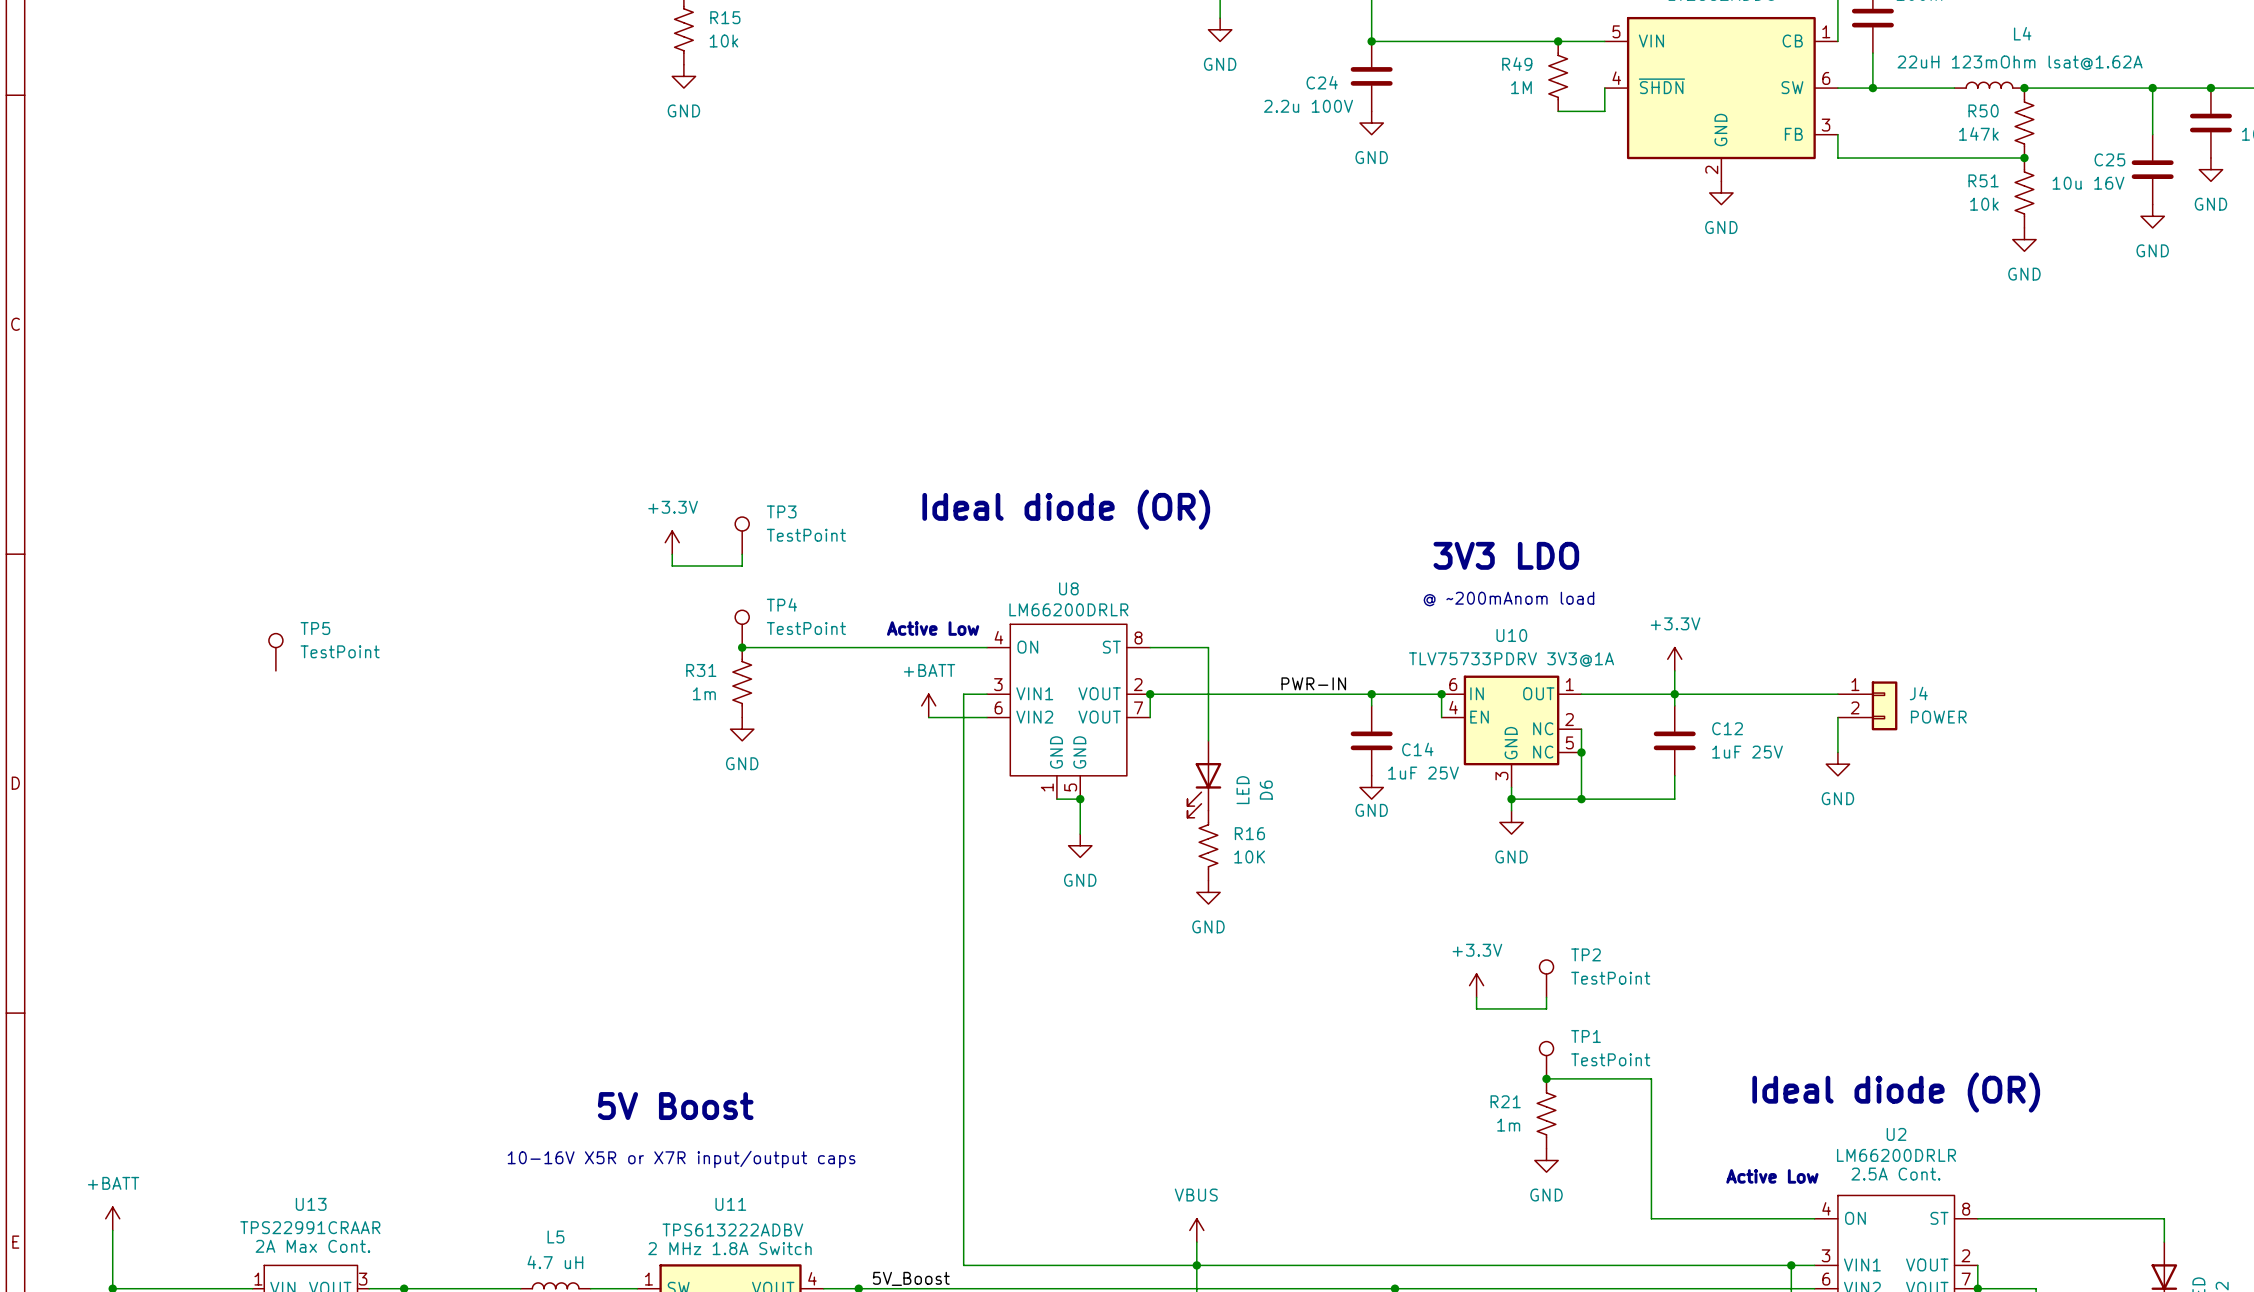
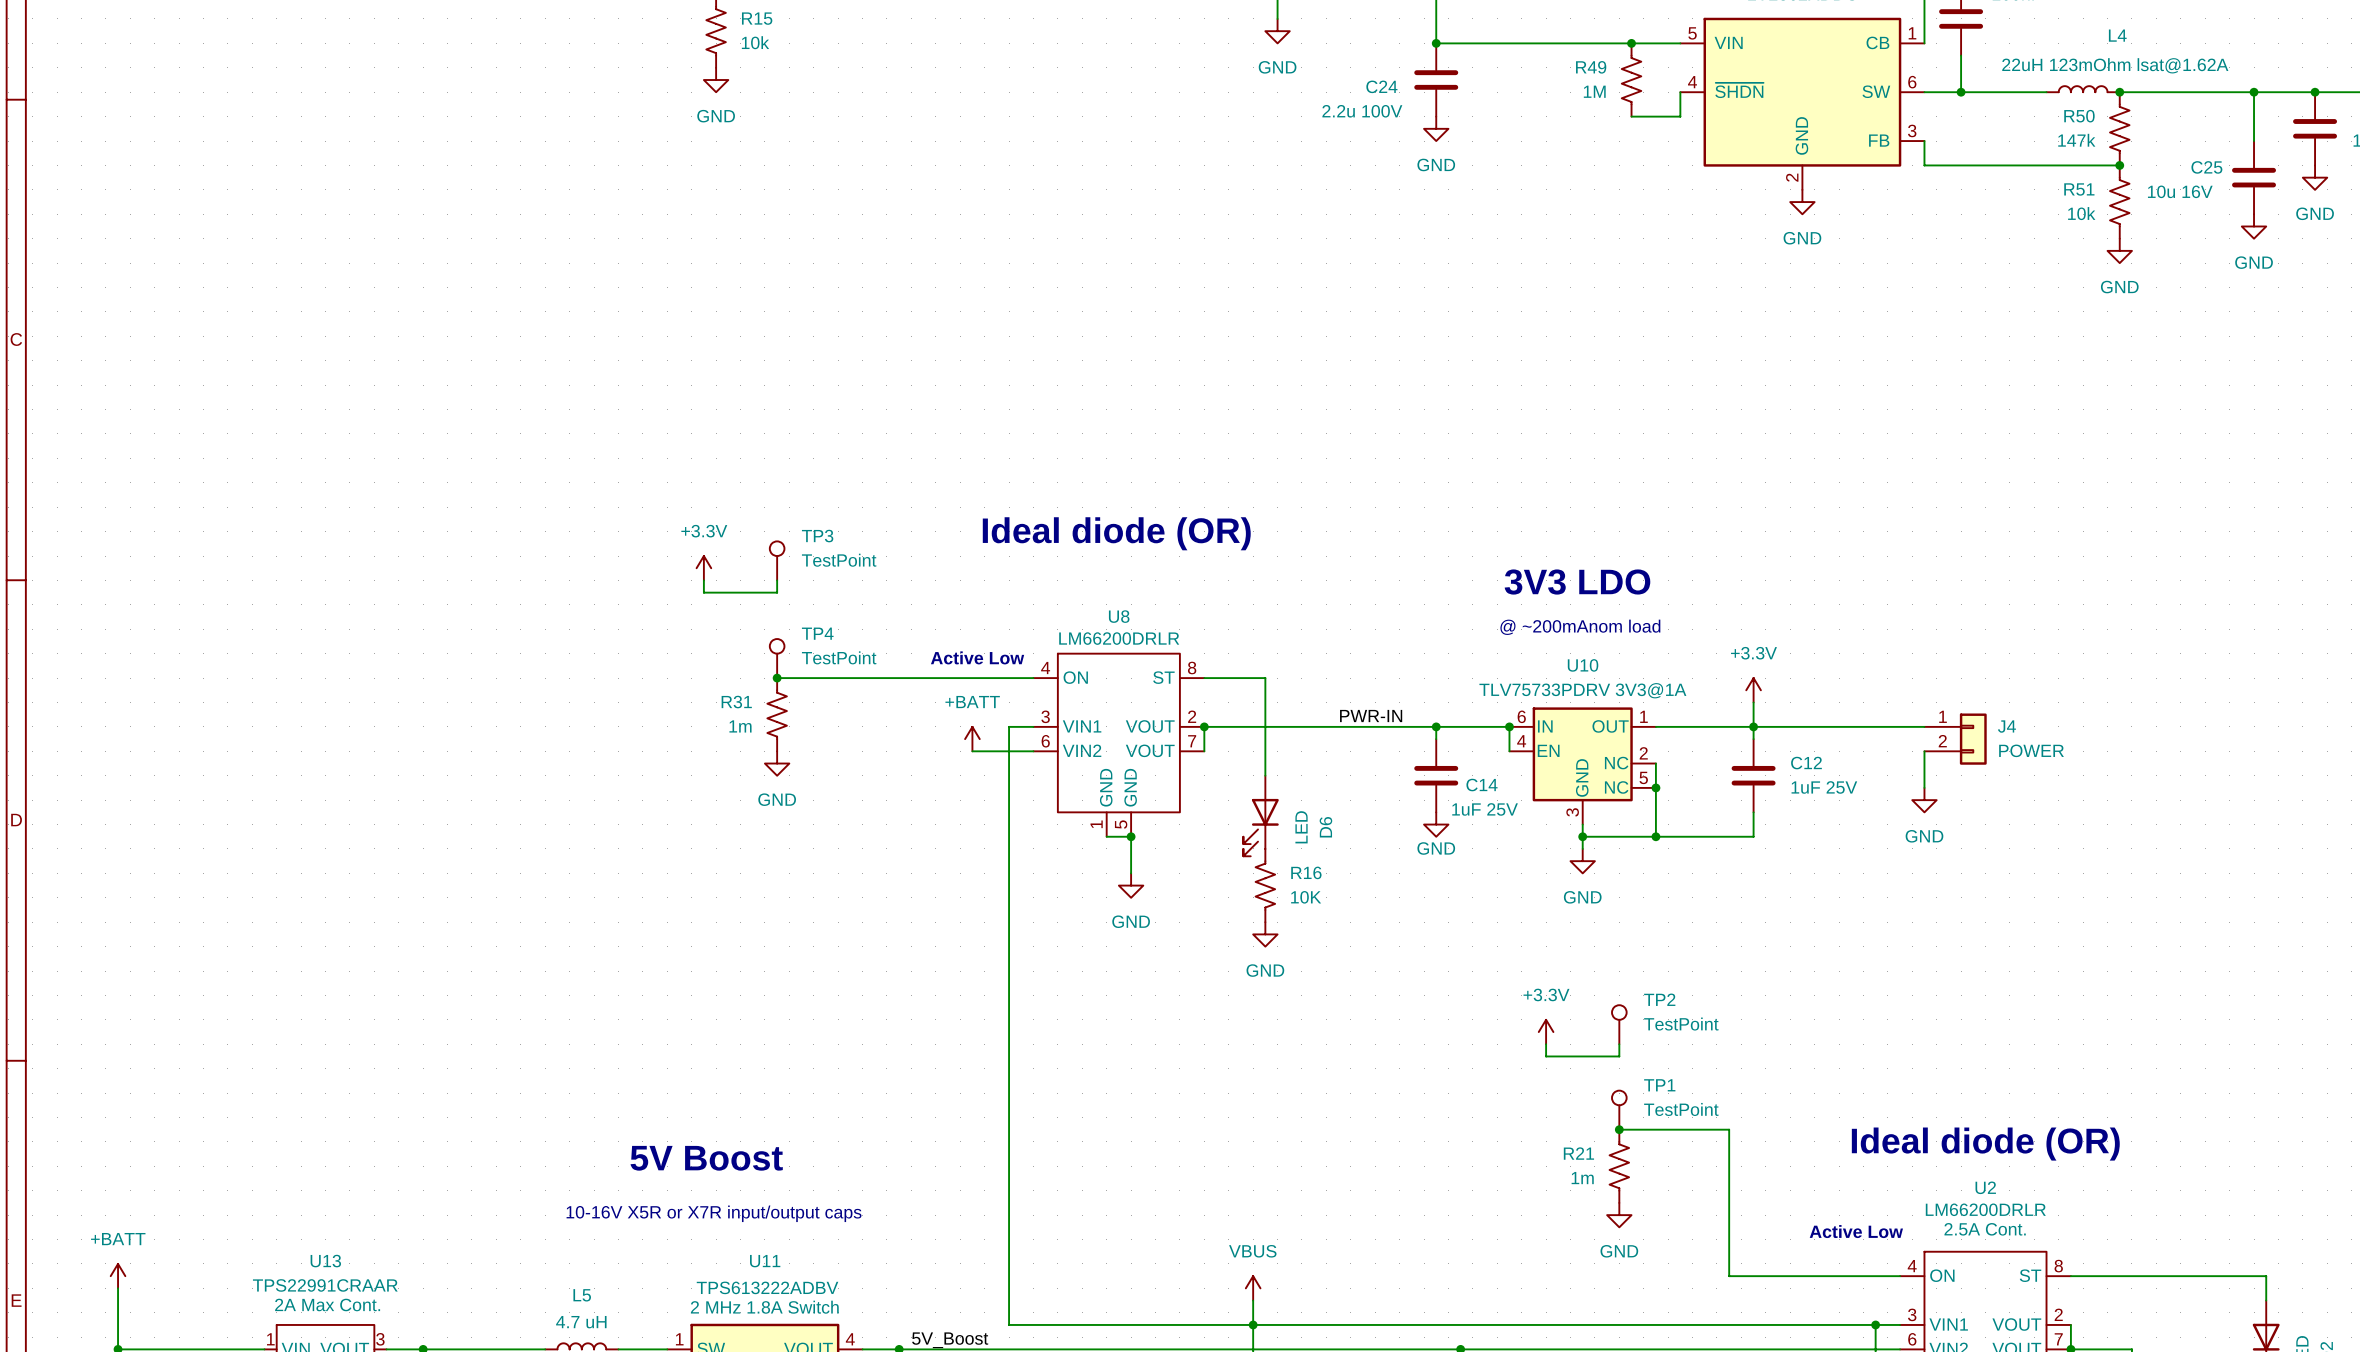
TP5: TestPoint (275, 652) -> none

